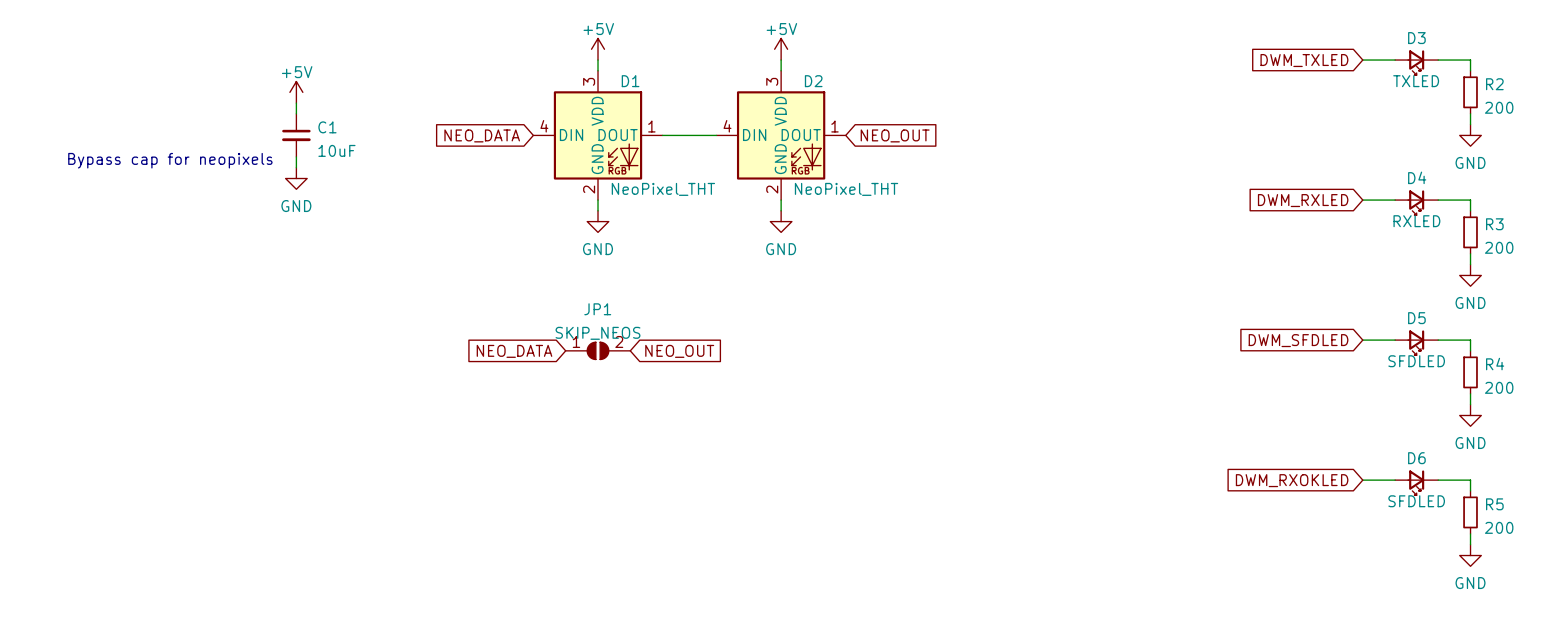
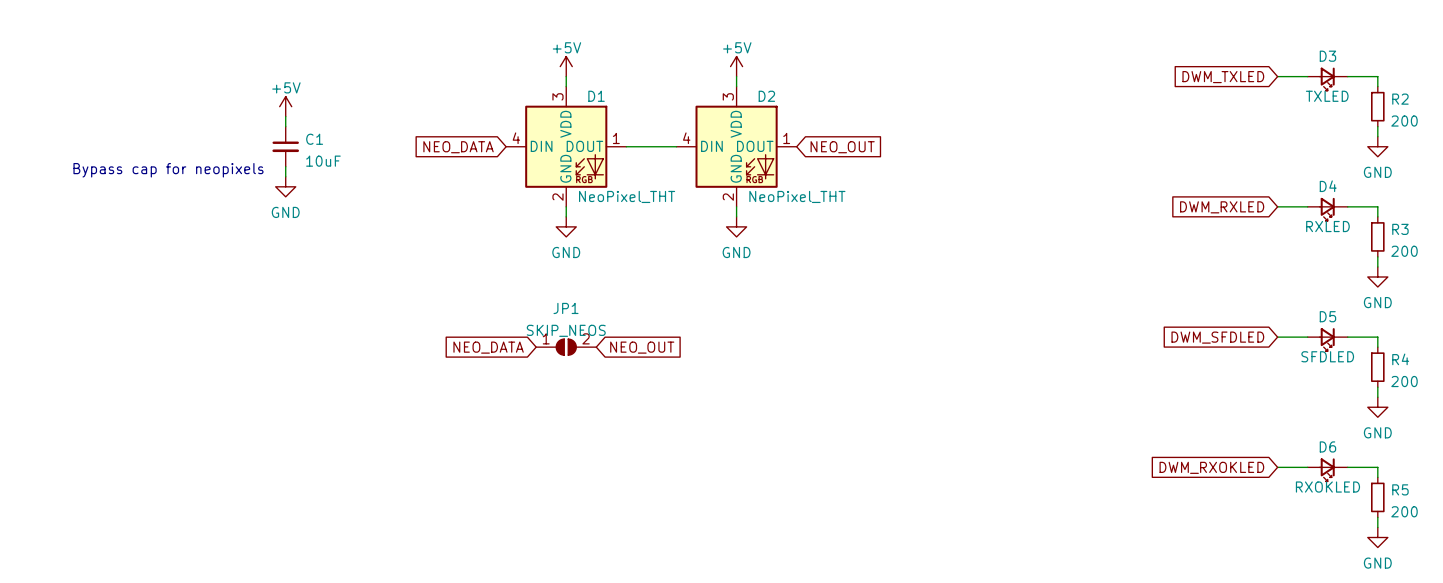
D6 value: SFDLED (1416, 501) -> RXOKLED (1327, 487)

